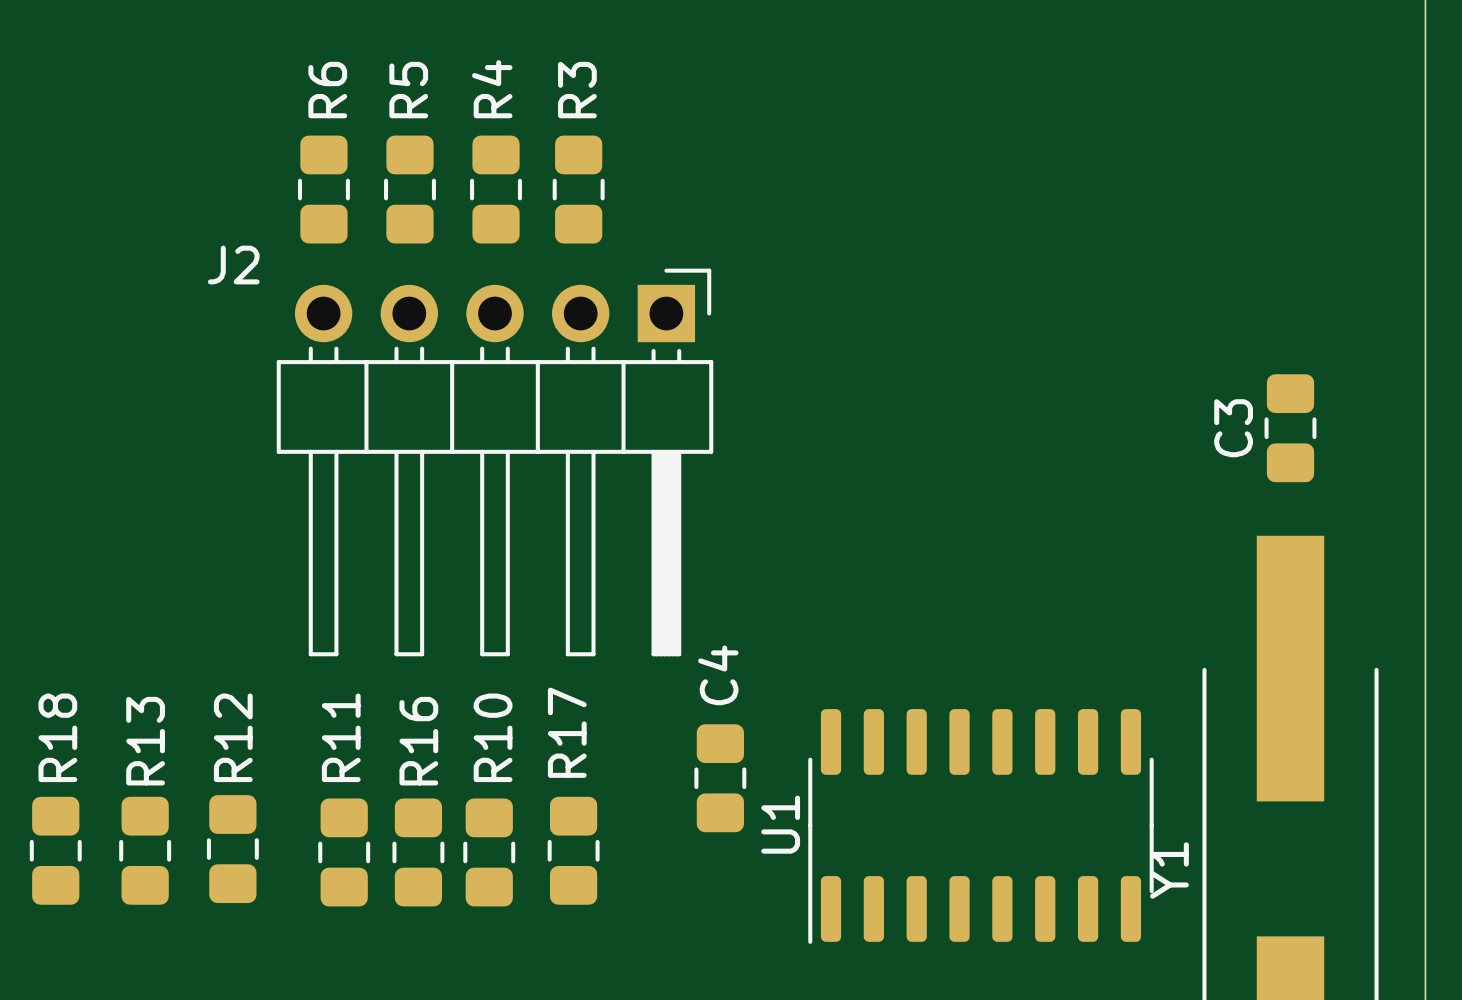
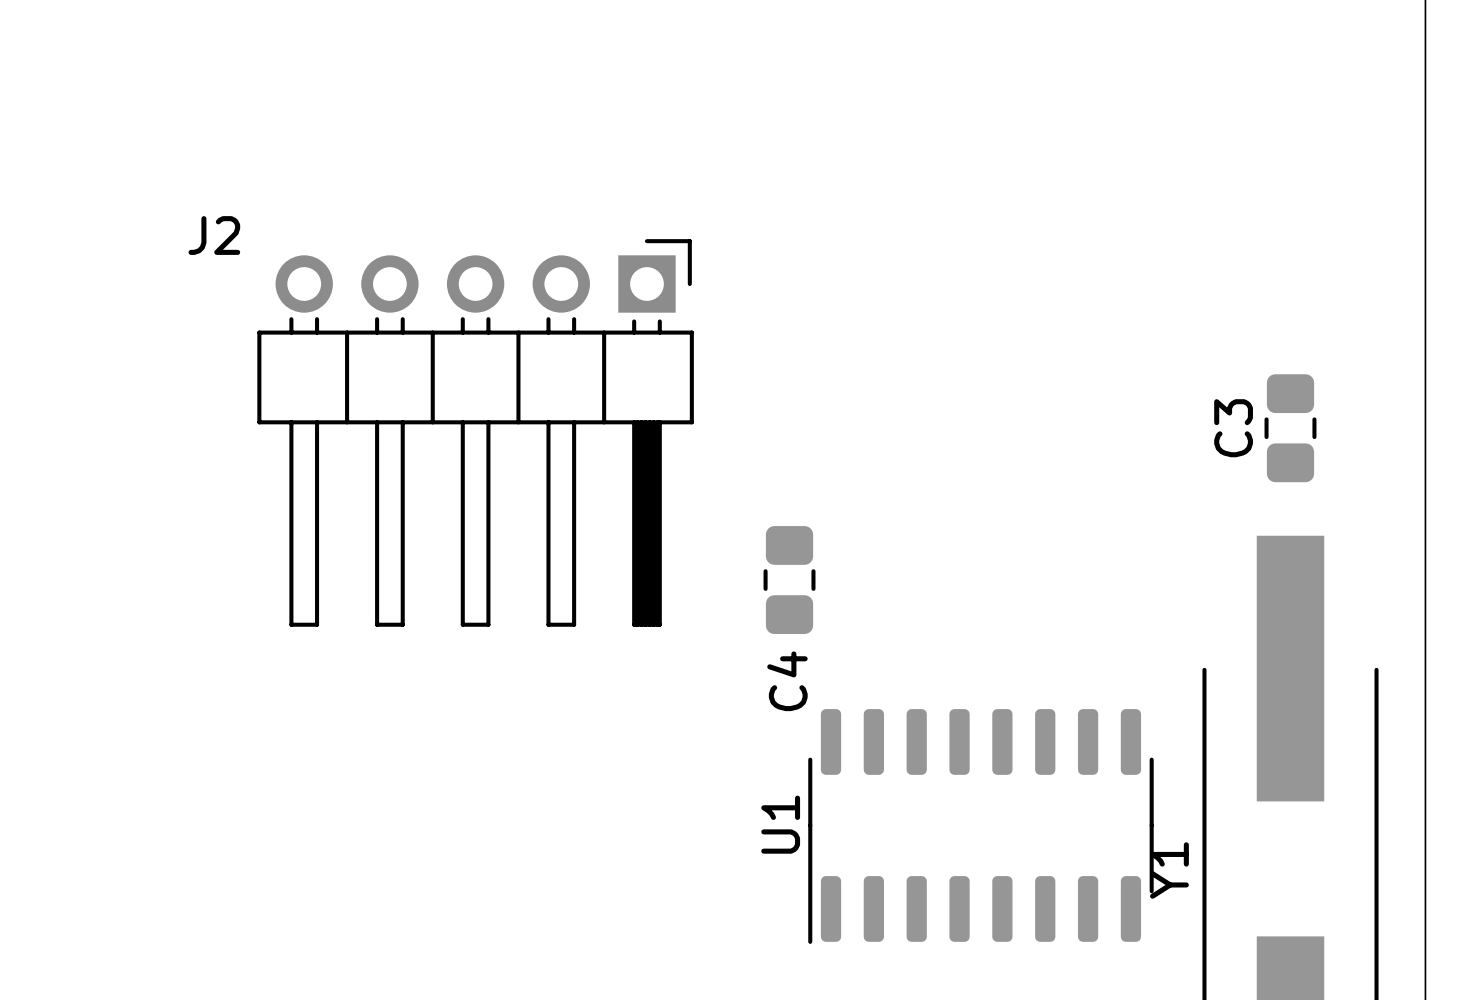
R6: (323, 189) -> none
R5: (409, 189) -> none
R4: (496, 189) -> none
R3: (578, 189) -> none
J2 position: (495, 462) -> (475, 432)
C4 name position: C4 (718, 675) -> C4 (787, 681)
C4 position: (720, 778) -> (789, 580)
R12: (232, 849) -> none
R18: (55, 850) -> none
R13: (145, 850) -> none
R17: (573, 850) -> none
R11: (344, 852) -> none
R16: (418, 852) -> none
R10: (489, 852) -> none

